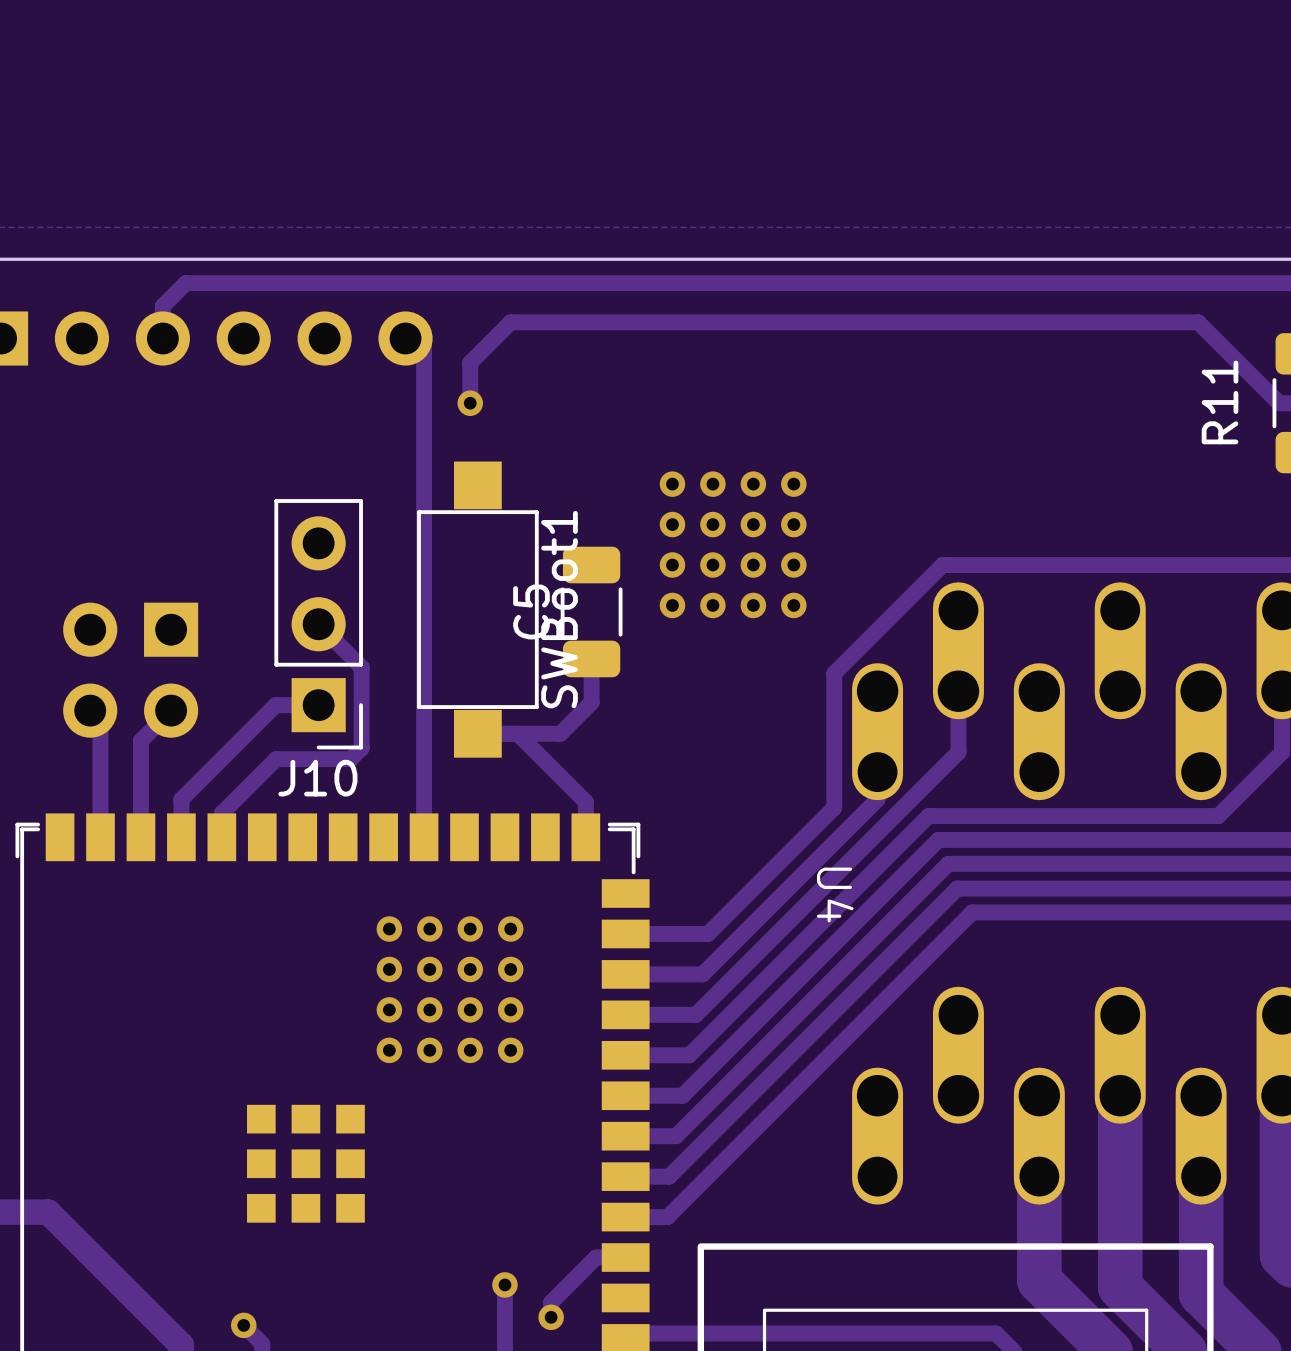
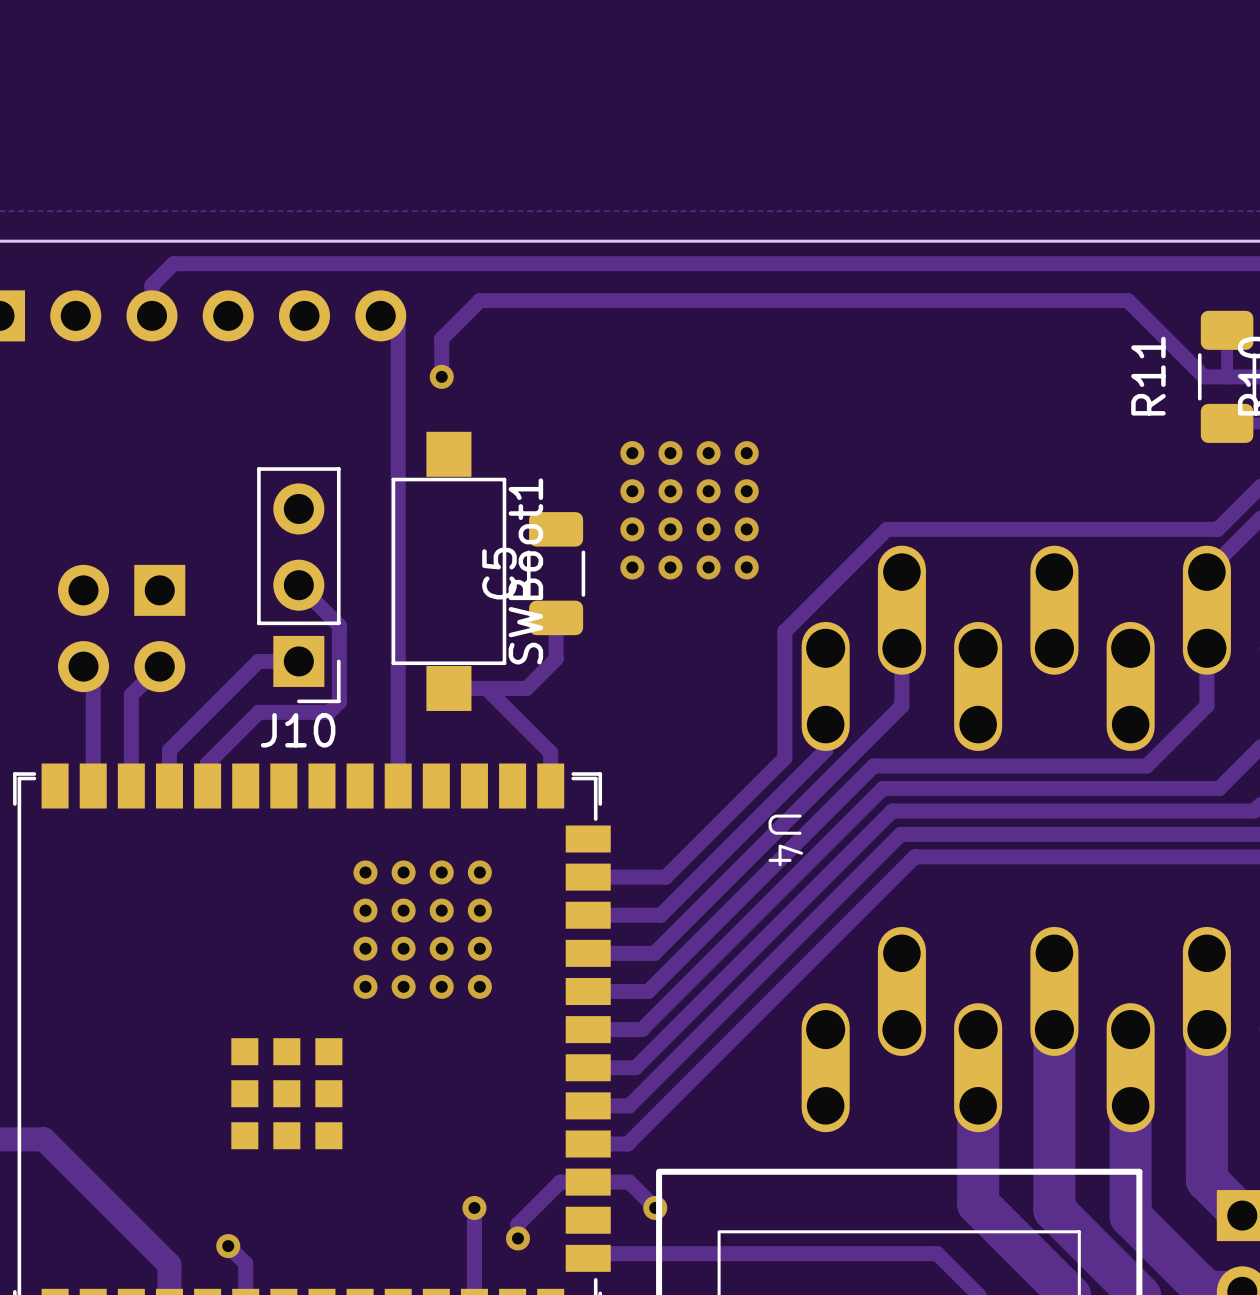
track: none -> (588, 1182) (629, 1182) (655, 1207)
via: none -> (655, 1207)

